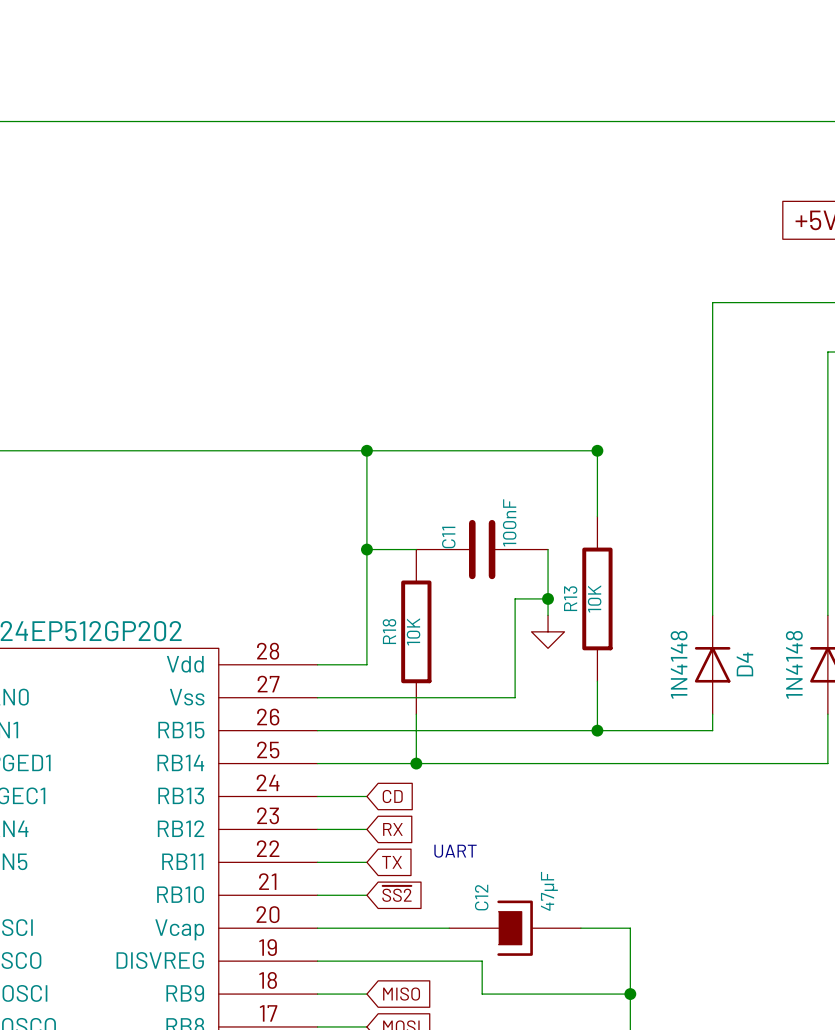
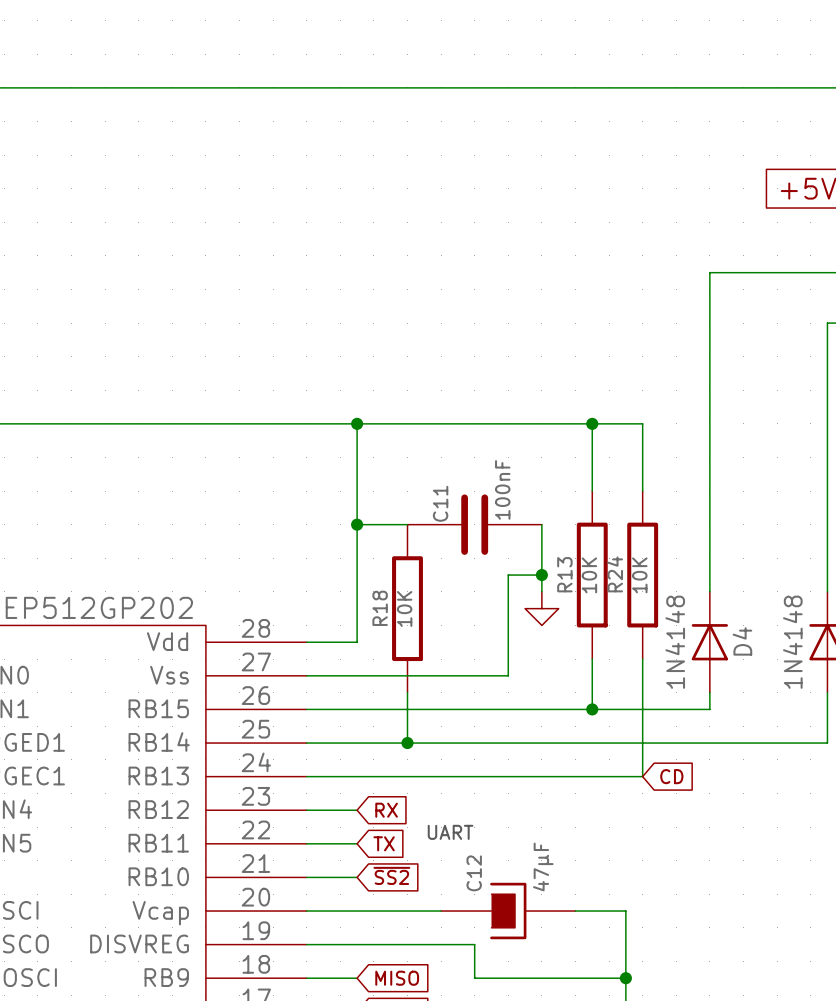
wire: none -> (592, 423) (642, 423) (642, 491)
R24: none -> 10K (642, 575)
wire: none -> (642, 659) (642, 776) (357, 776)
global label position: CD (392, 796) -> CD (671, 776)

